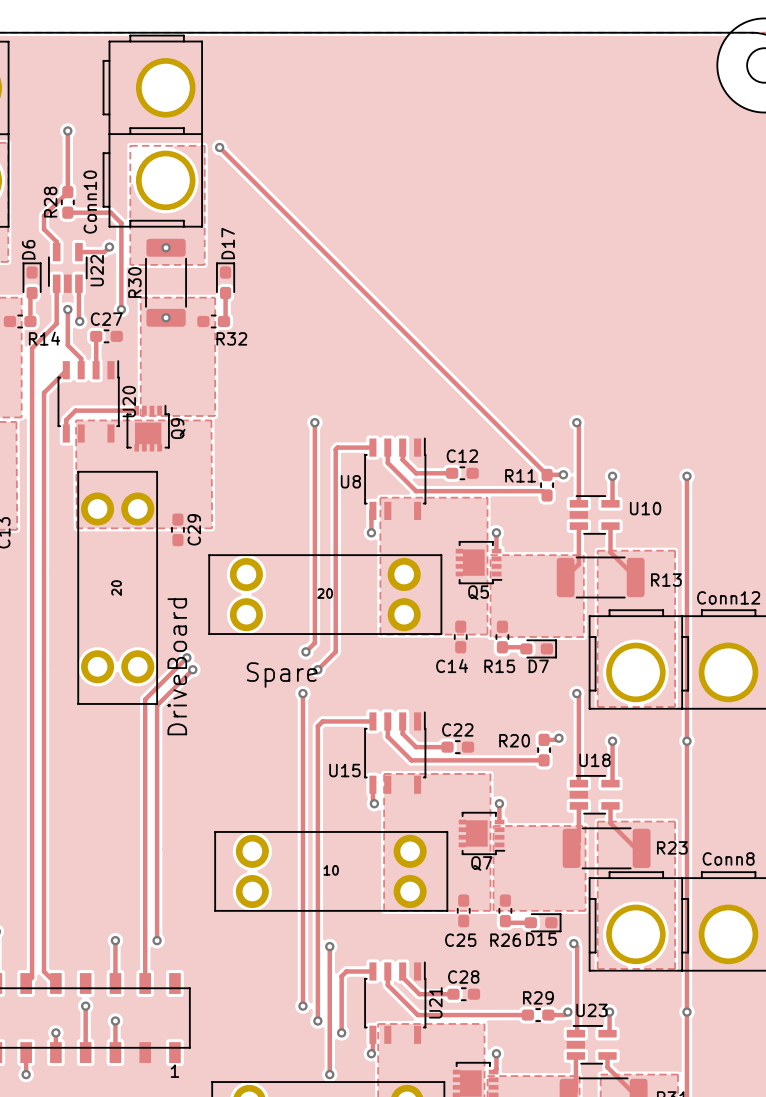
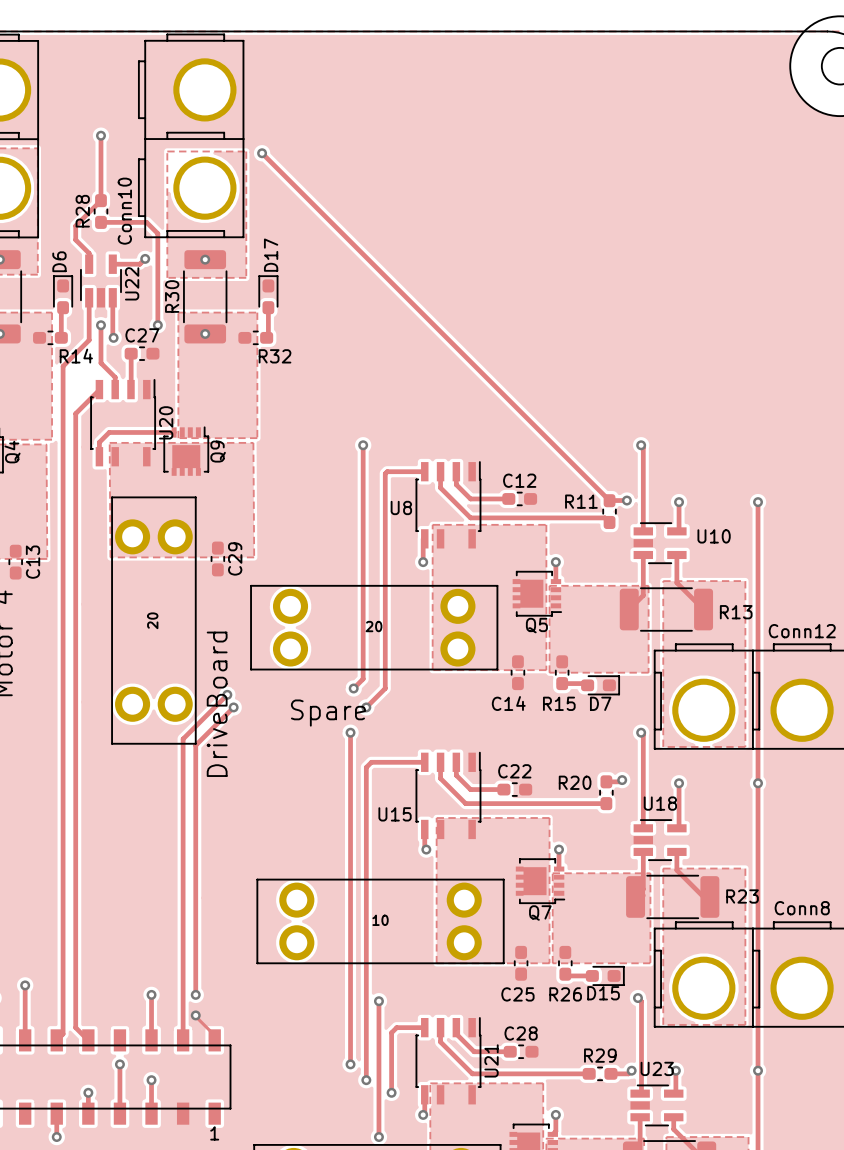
track: none -> (195, 1015) (214, 1035) (214, 1040)
via: none -> (195, 1015)

